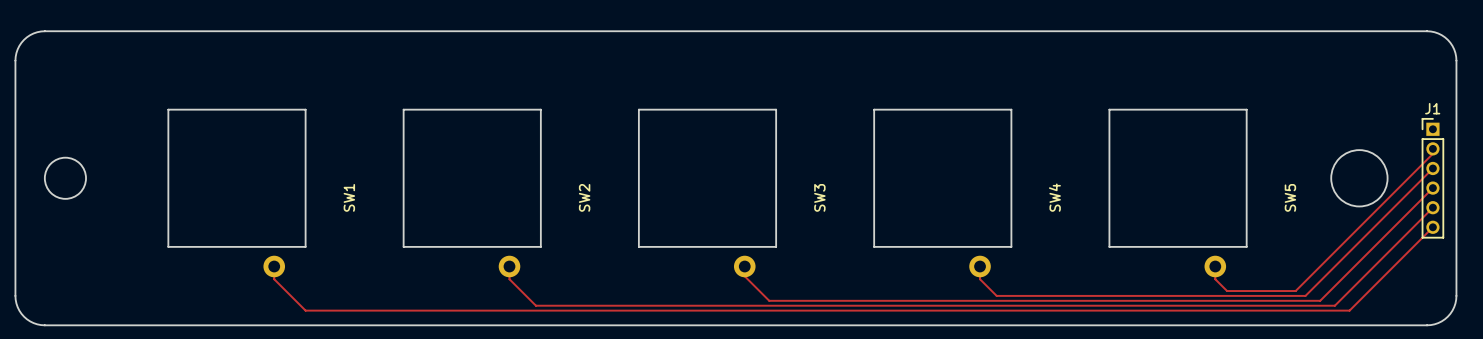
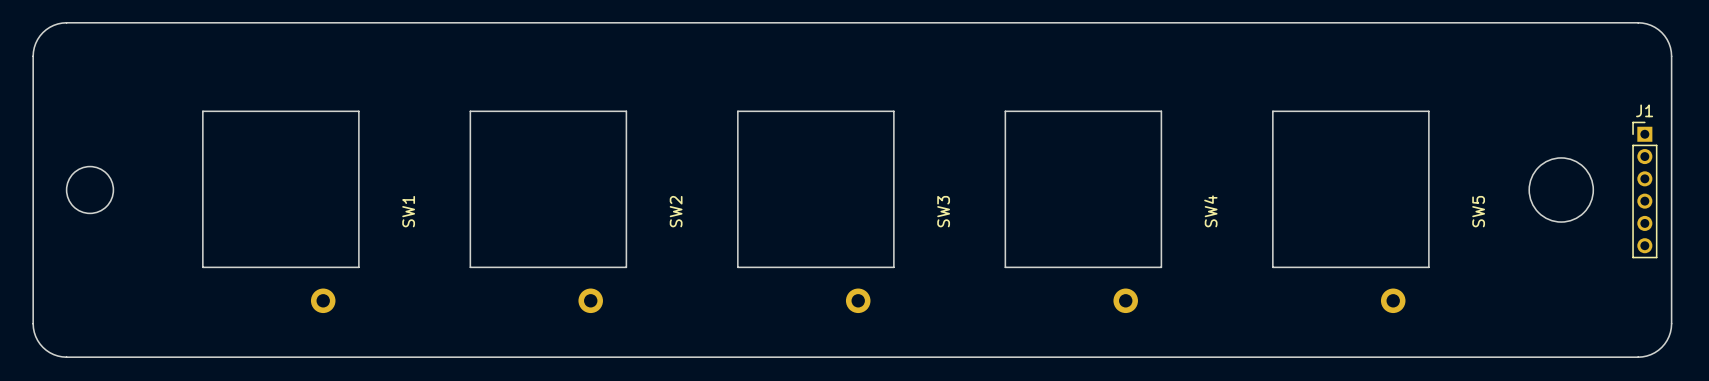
SW1 footprint: [167, 109, 307, 278] -> [202, 110, 360, 314]
SW2 footprint: [403, 109, 542, 278] -> [469, 110, 628, 314]
SW3 footprint: [638, 109, 777, 278] -> [737, 110, 895, 314]
SW4 footprint: [873, 109, 1012, 278] -> [1004, 110, 1163, 314]
SW5 footprint: [1108, 109, 1248, 278] -> [1272, 110, 1430, 314]
track: (1432, 148) (1432, 153) (1295, 291) (1227, 291) (1215, 279) (1215, 266) -> none
track: (1432, 168) (1305, 295) (996, 295) (980, 279) (980, 266) -> none
track: (1432, 188) (1320, 300) (769, 300) (744, 276) (744, 266) -> none
track: (1432, 207) (1334, 305) (535, 305) (509, 279) (509, 266) -> none
track: (1432, 227) (1349, 310) (305, 310) (274, 279) (274, 266) -> none

